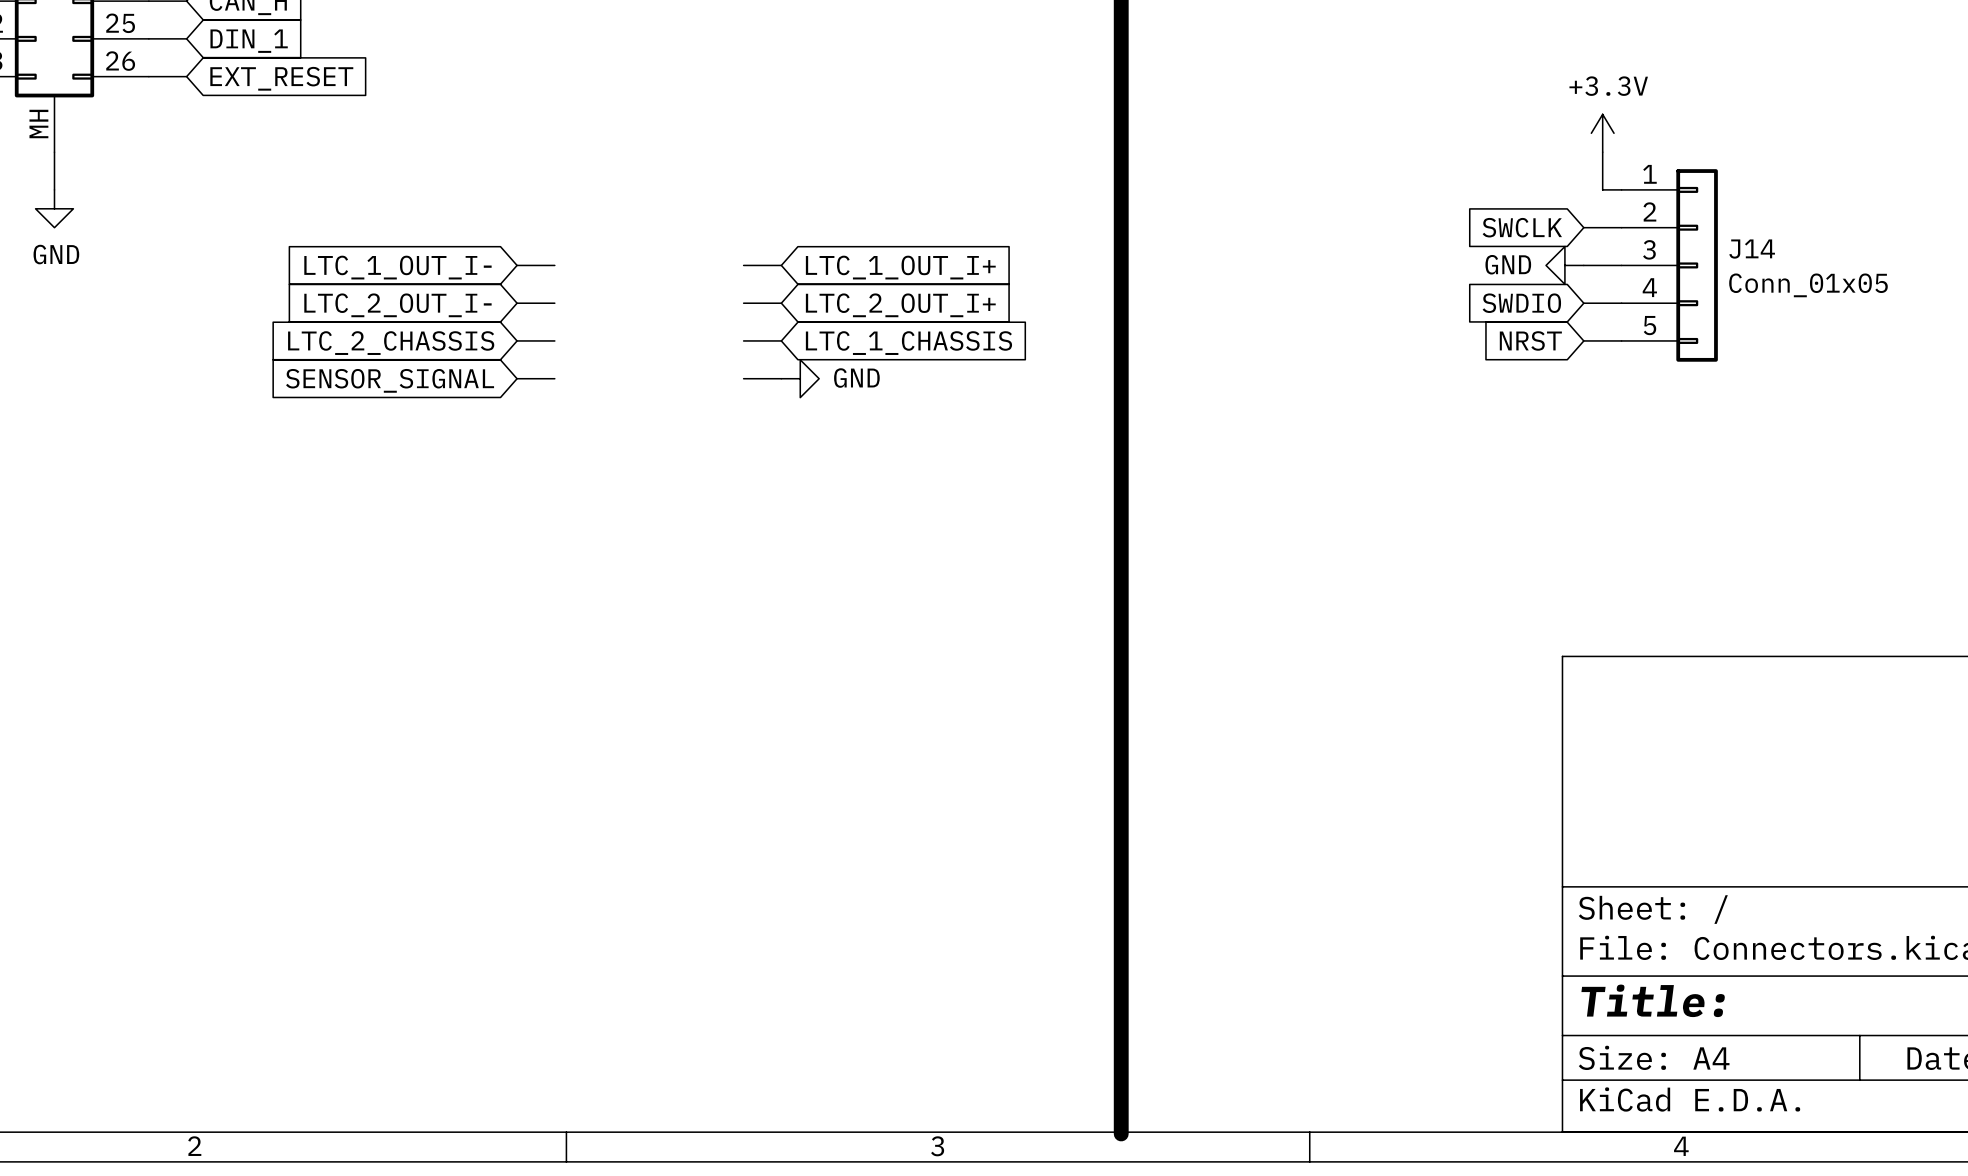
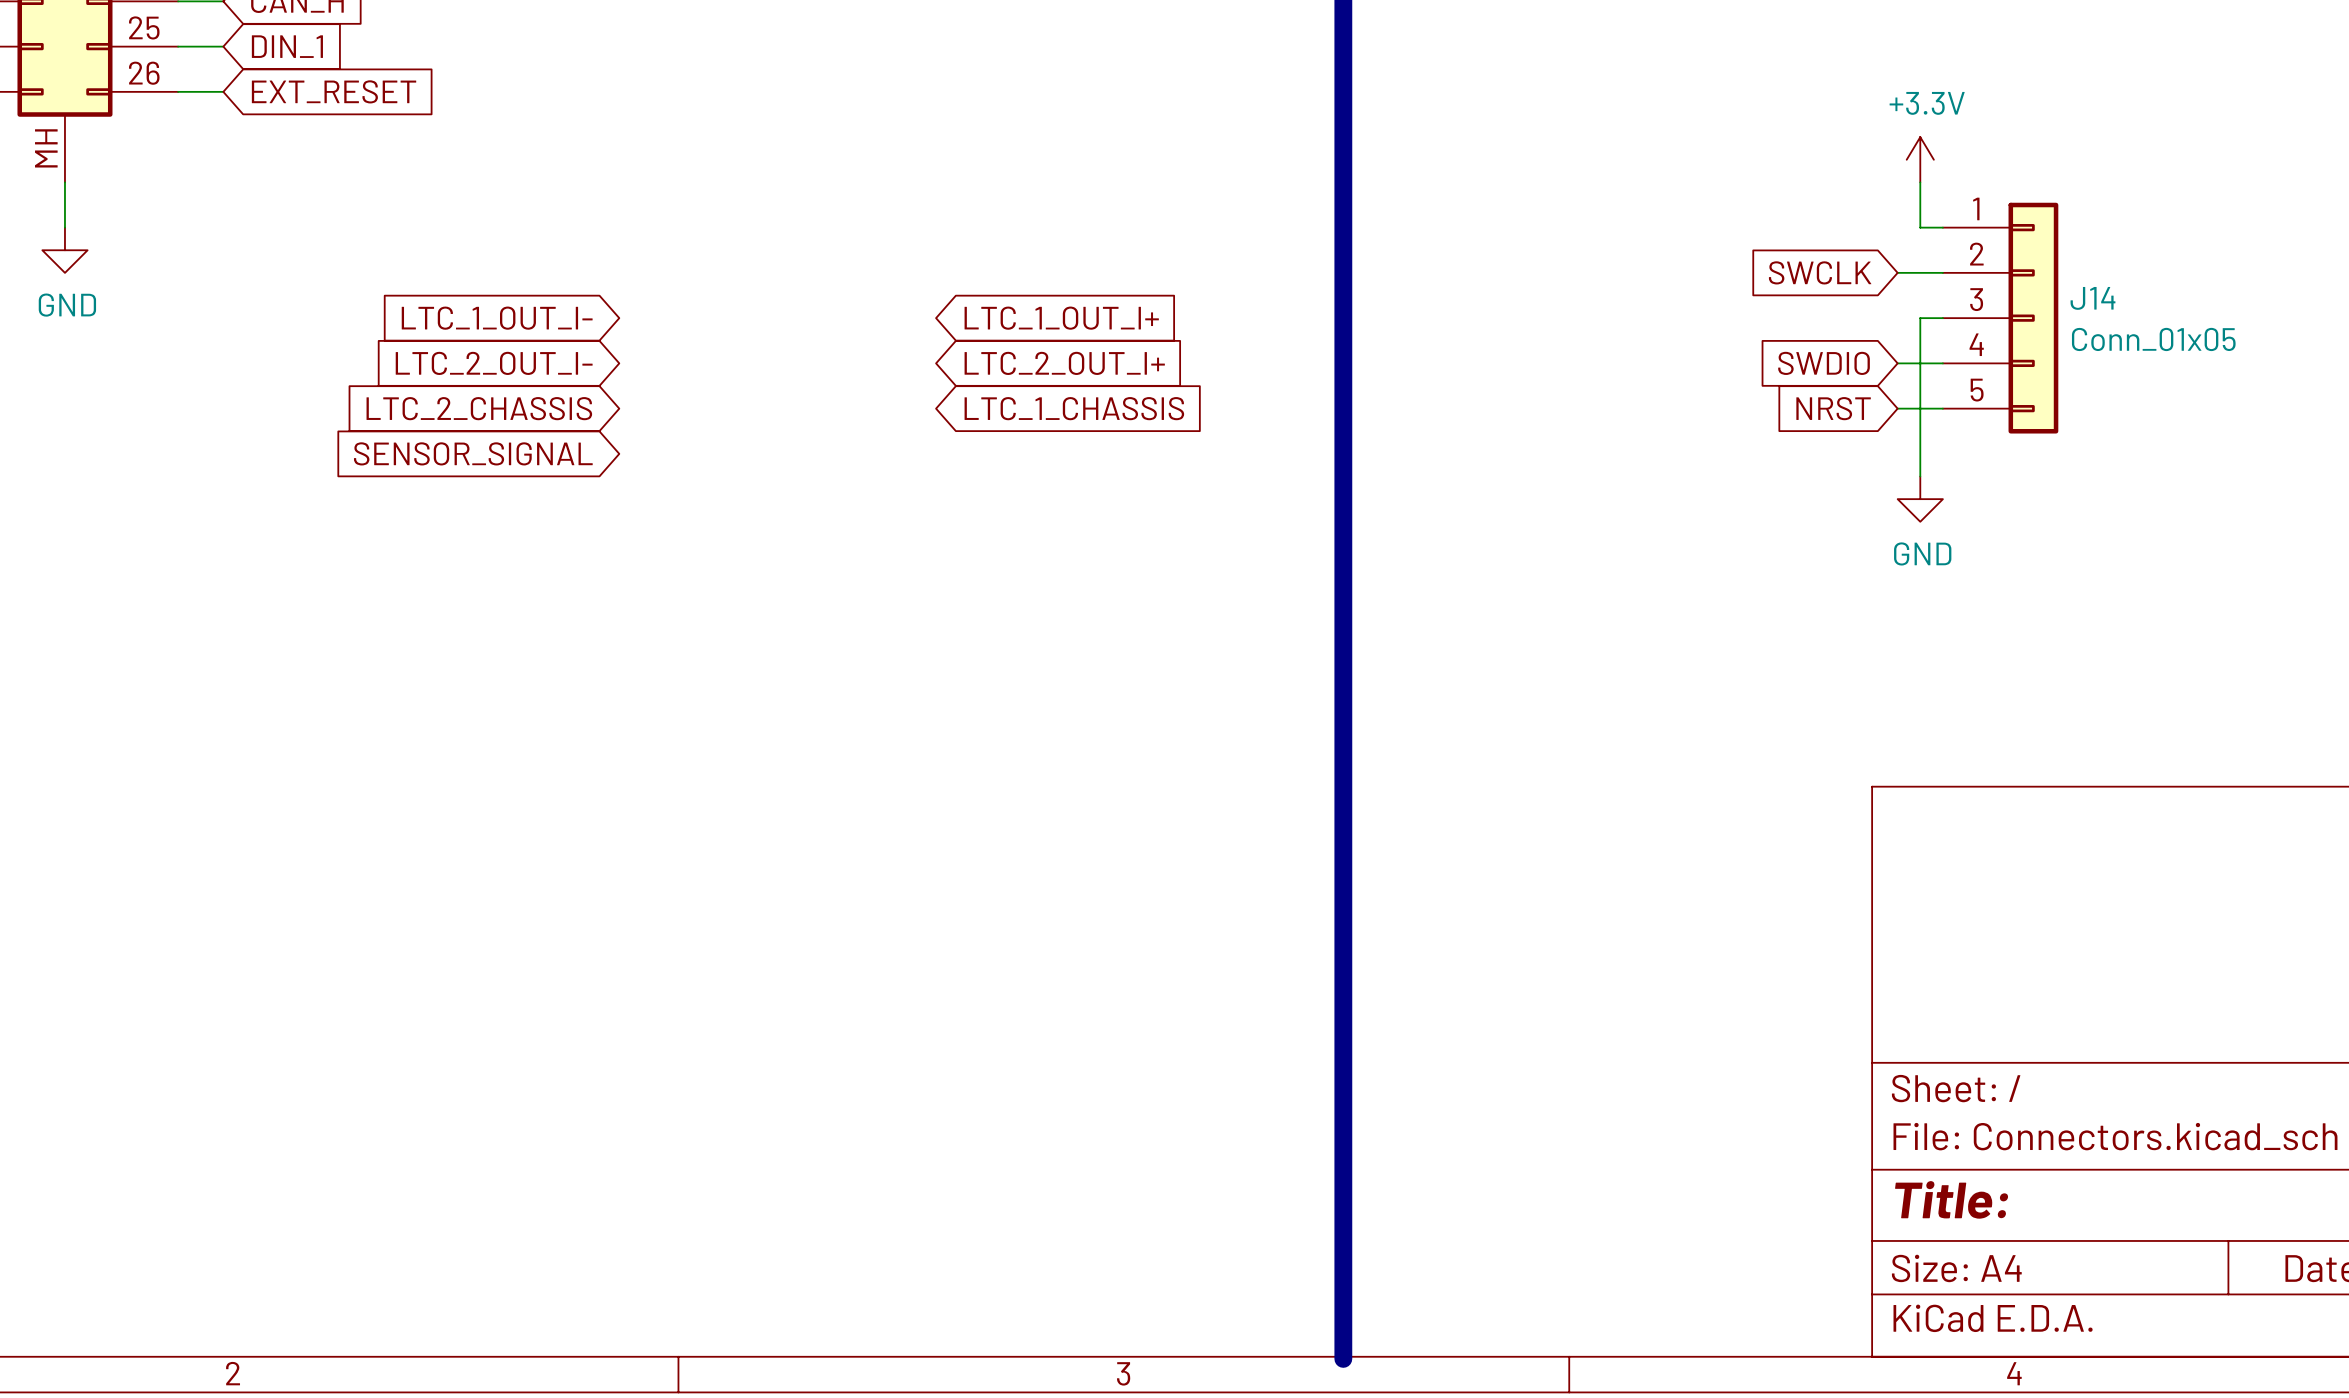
wire: (517, 265) (554, 265) -> none
wire: (743, 265) (781, 265) -> none
power symbol rotation: 0° (1564, 265) -> 90° counterclockwise (1920, 499)
power symbol position: GND (1564, 265) -> GND (1920, 499)
wire: (1583, 265) (1602, 265) -> (1920, 476) (1920, 318)
wire: (517, 303) (554, 303) -> none
wire: (743, 303) (781, 303) -> none
wire: (517, 340) (554, 340) -> none
wire: (743, 340) (781, 340) -> none
wire: (517, 378) (554, 378) -> none
wire: (743, 378) (781, 378) -> none
power symbol: GND (800, 378) -> none

